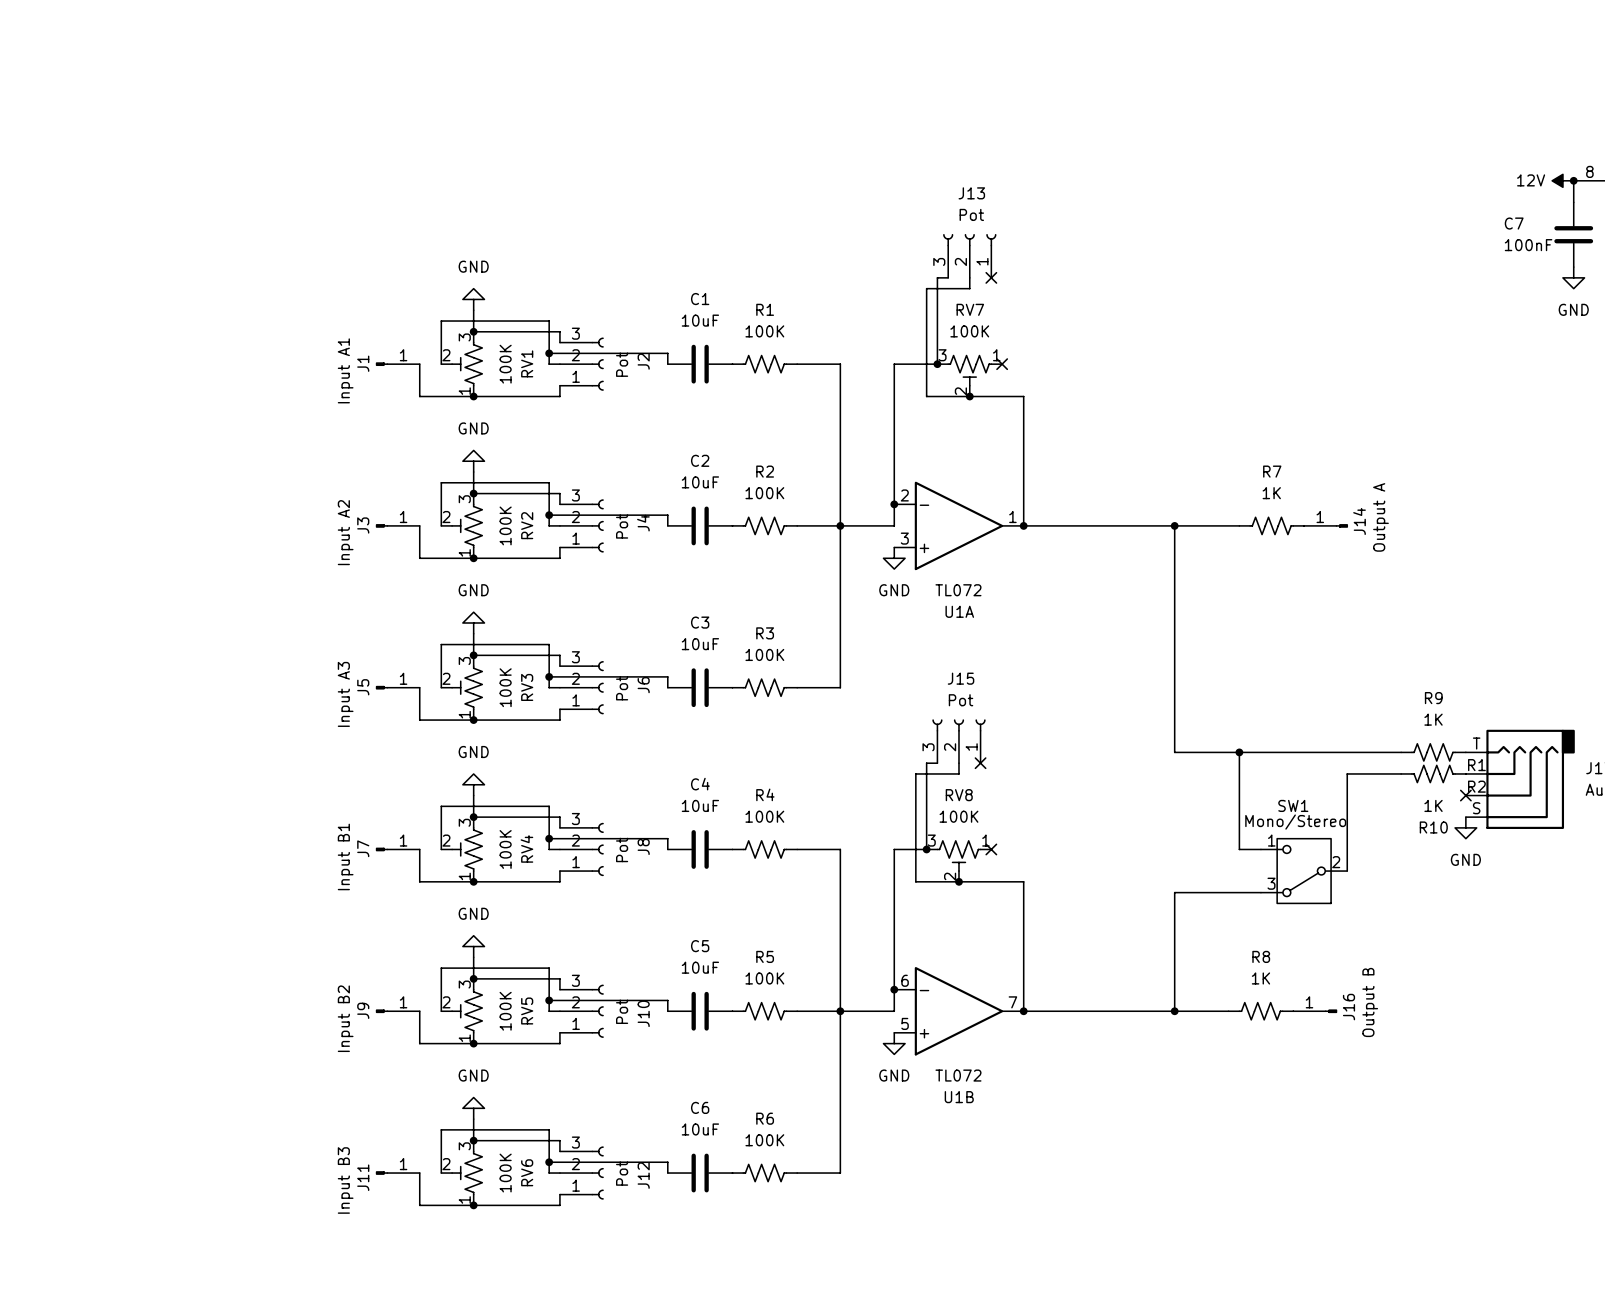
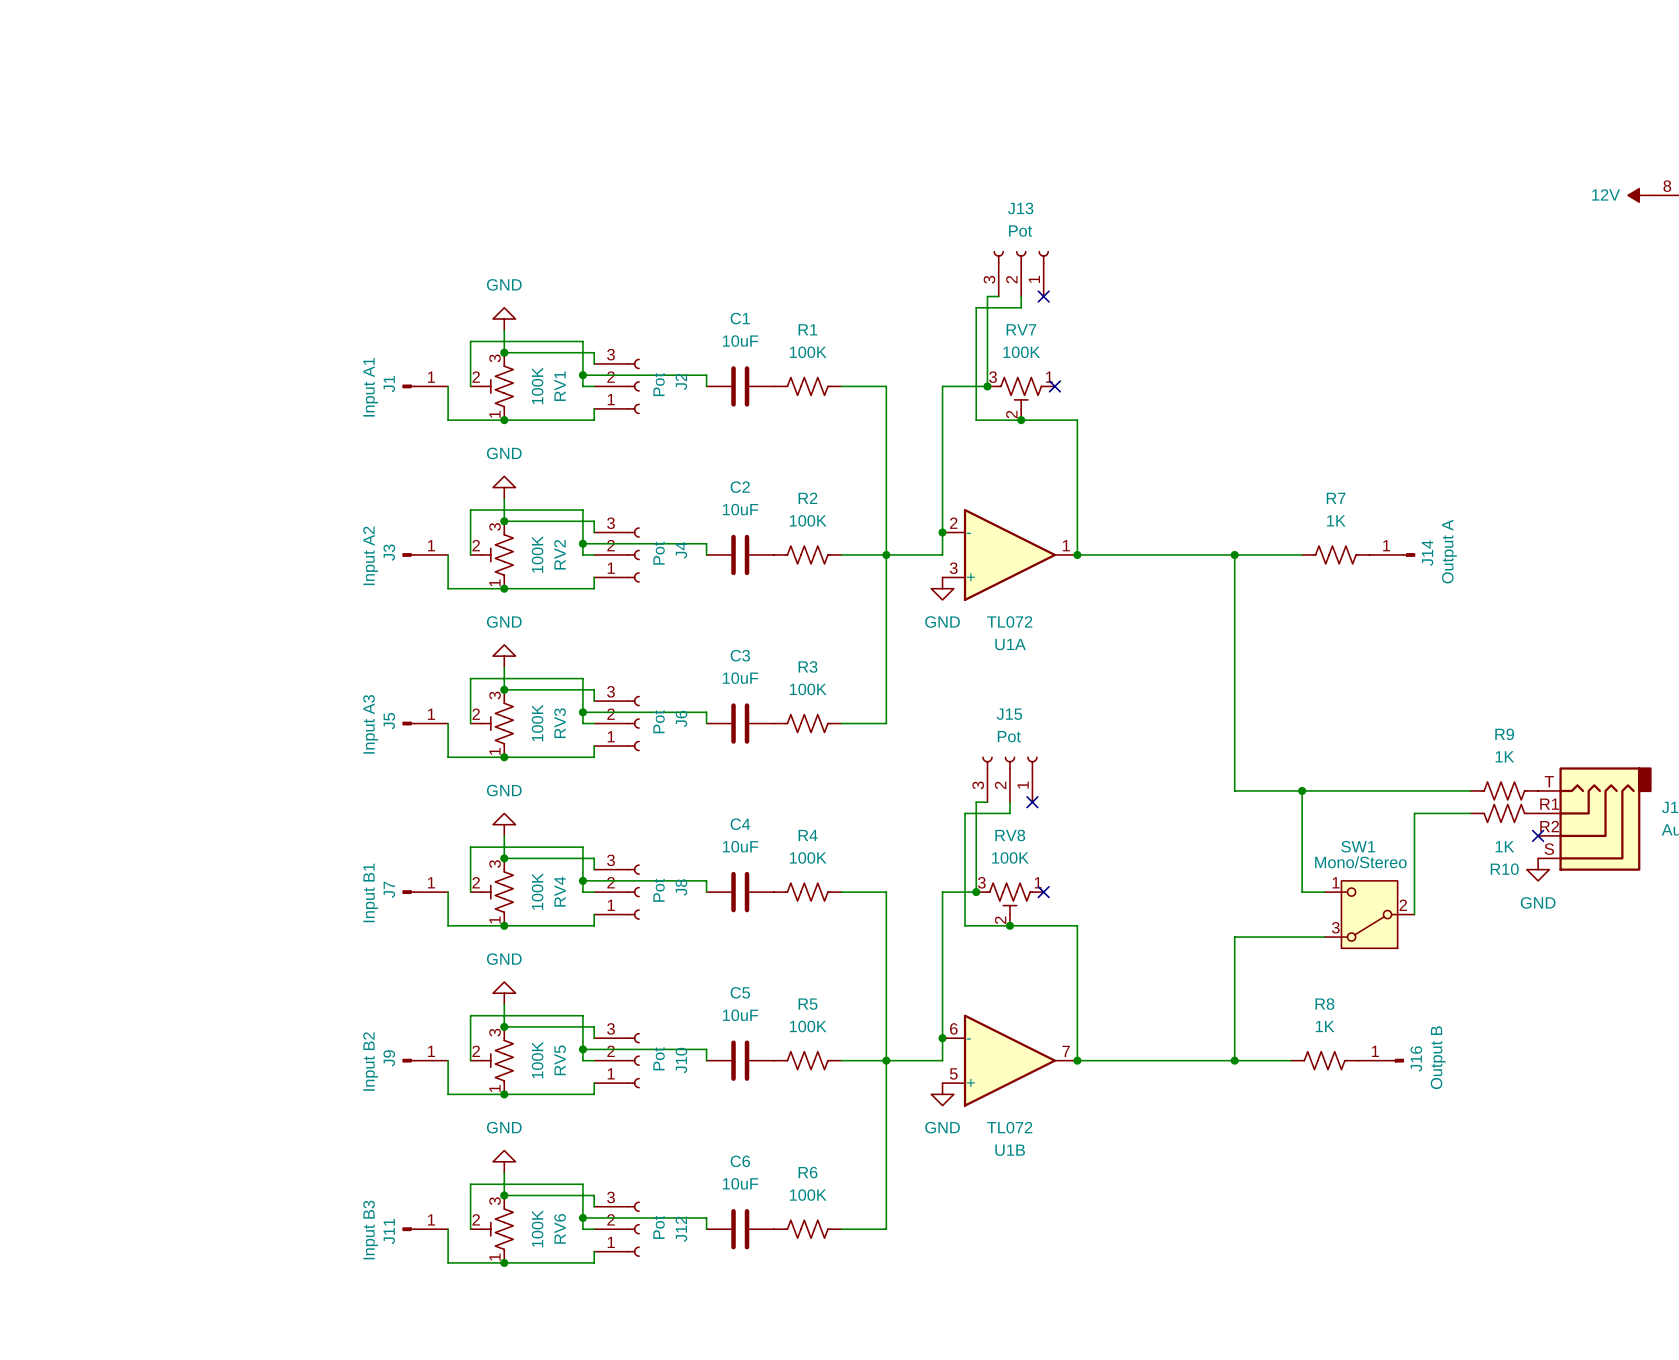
wire: (1573, 180) (1573, 202) -> none
junction: (1573, 180) -> none
C7: 100nF (1573, 234) -> none
power symbol: GND (1573, 277) -> none

